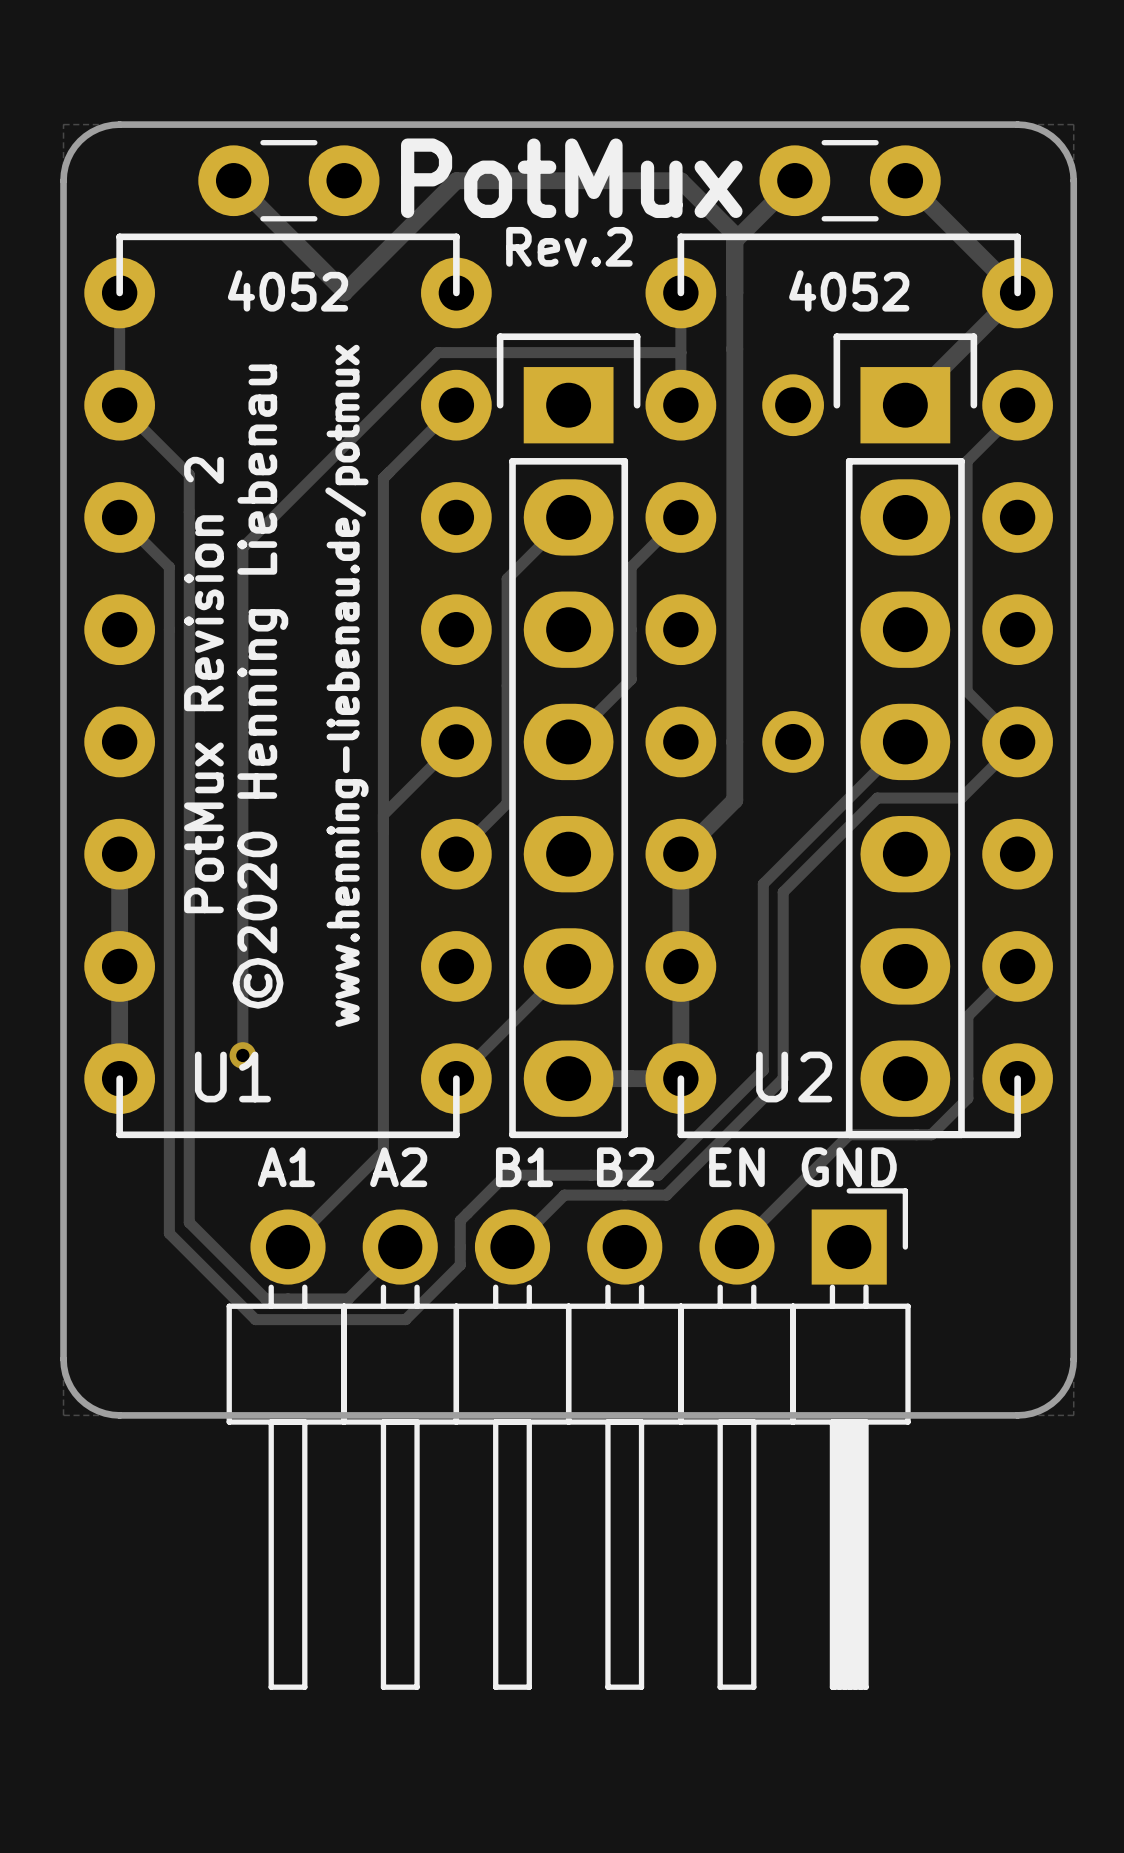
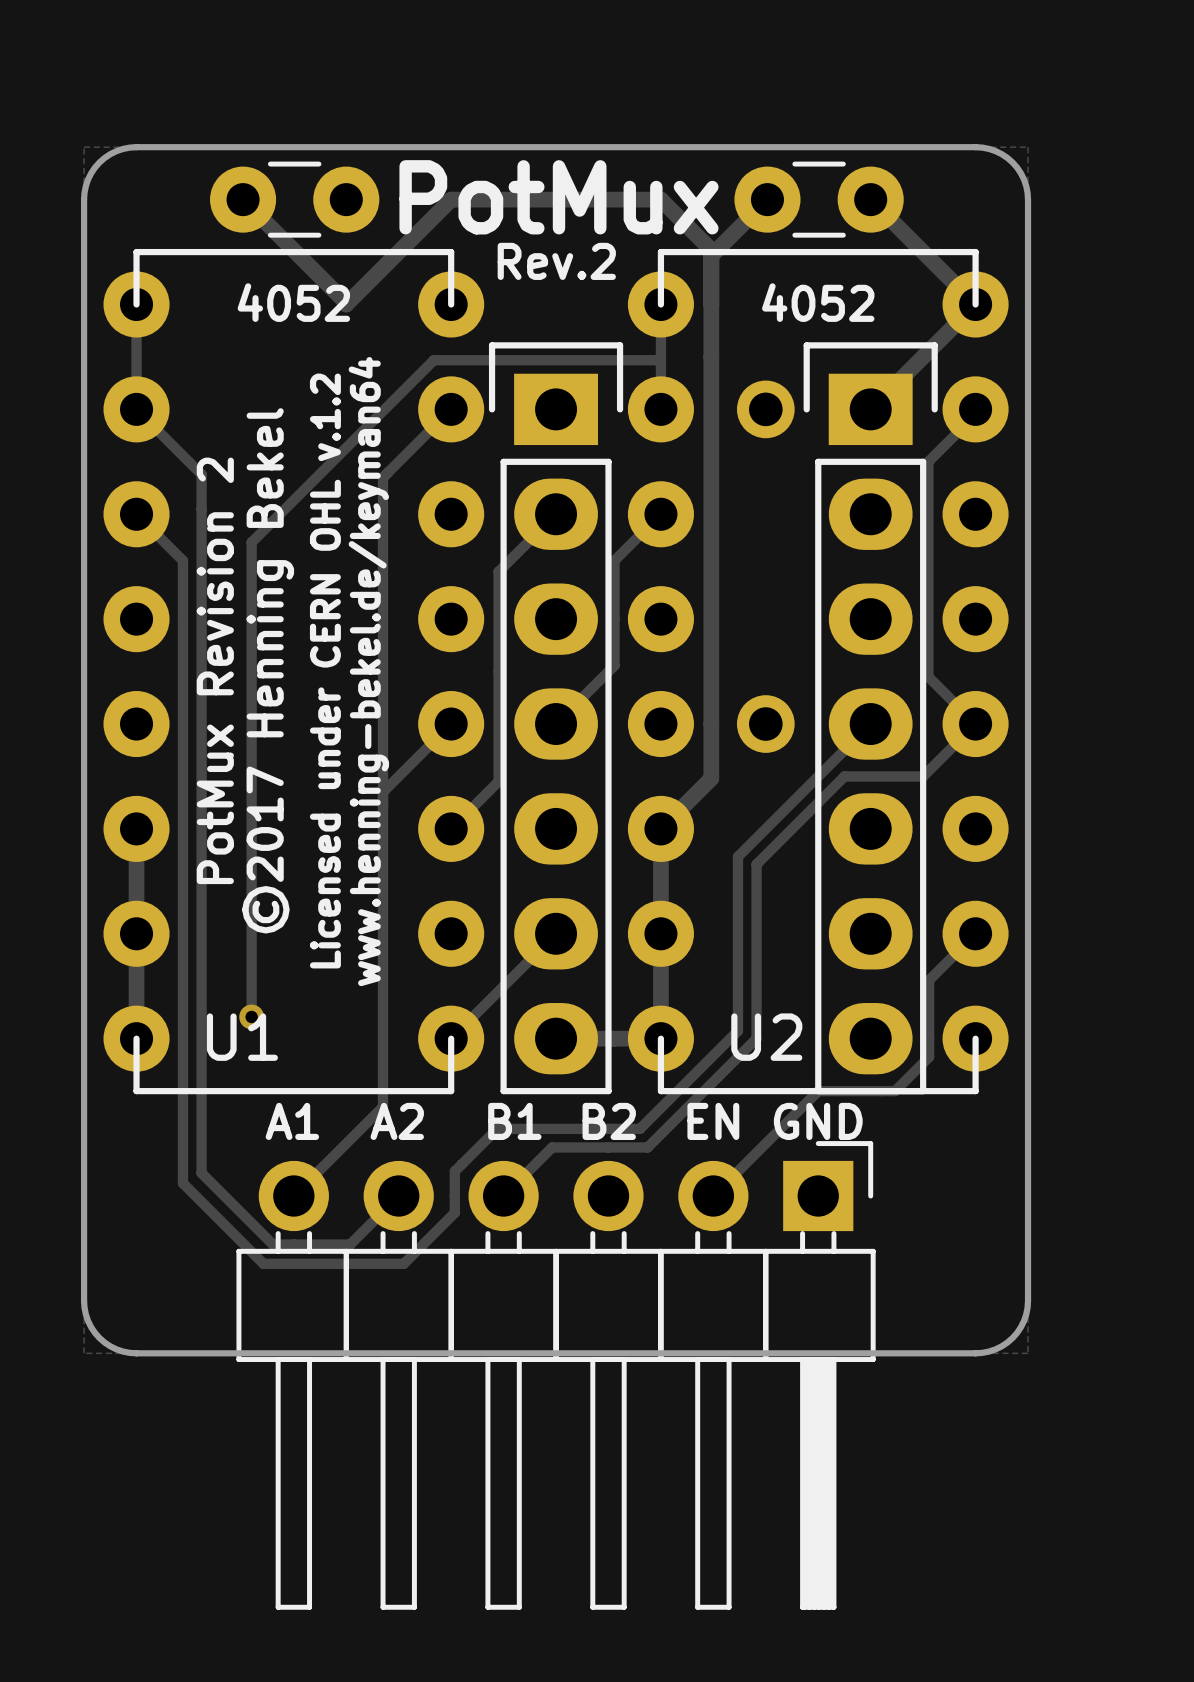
text: none -> Licensed under CERN OHL v.1.2 (325, 671)
text: www.henning-liebenau.de/potmux (346, 685) -> www.henning-bekel.de/keyman64 (368, 671)
text: ©2020 Henning Liebenau (260, 686) -> ©2017 Henning Bekel (268, 670)

